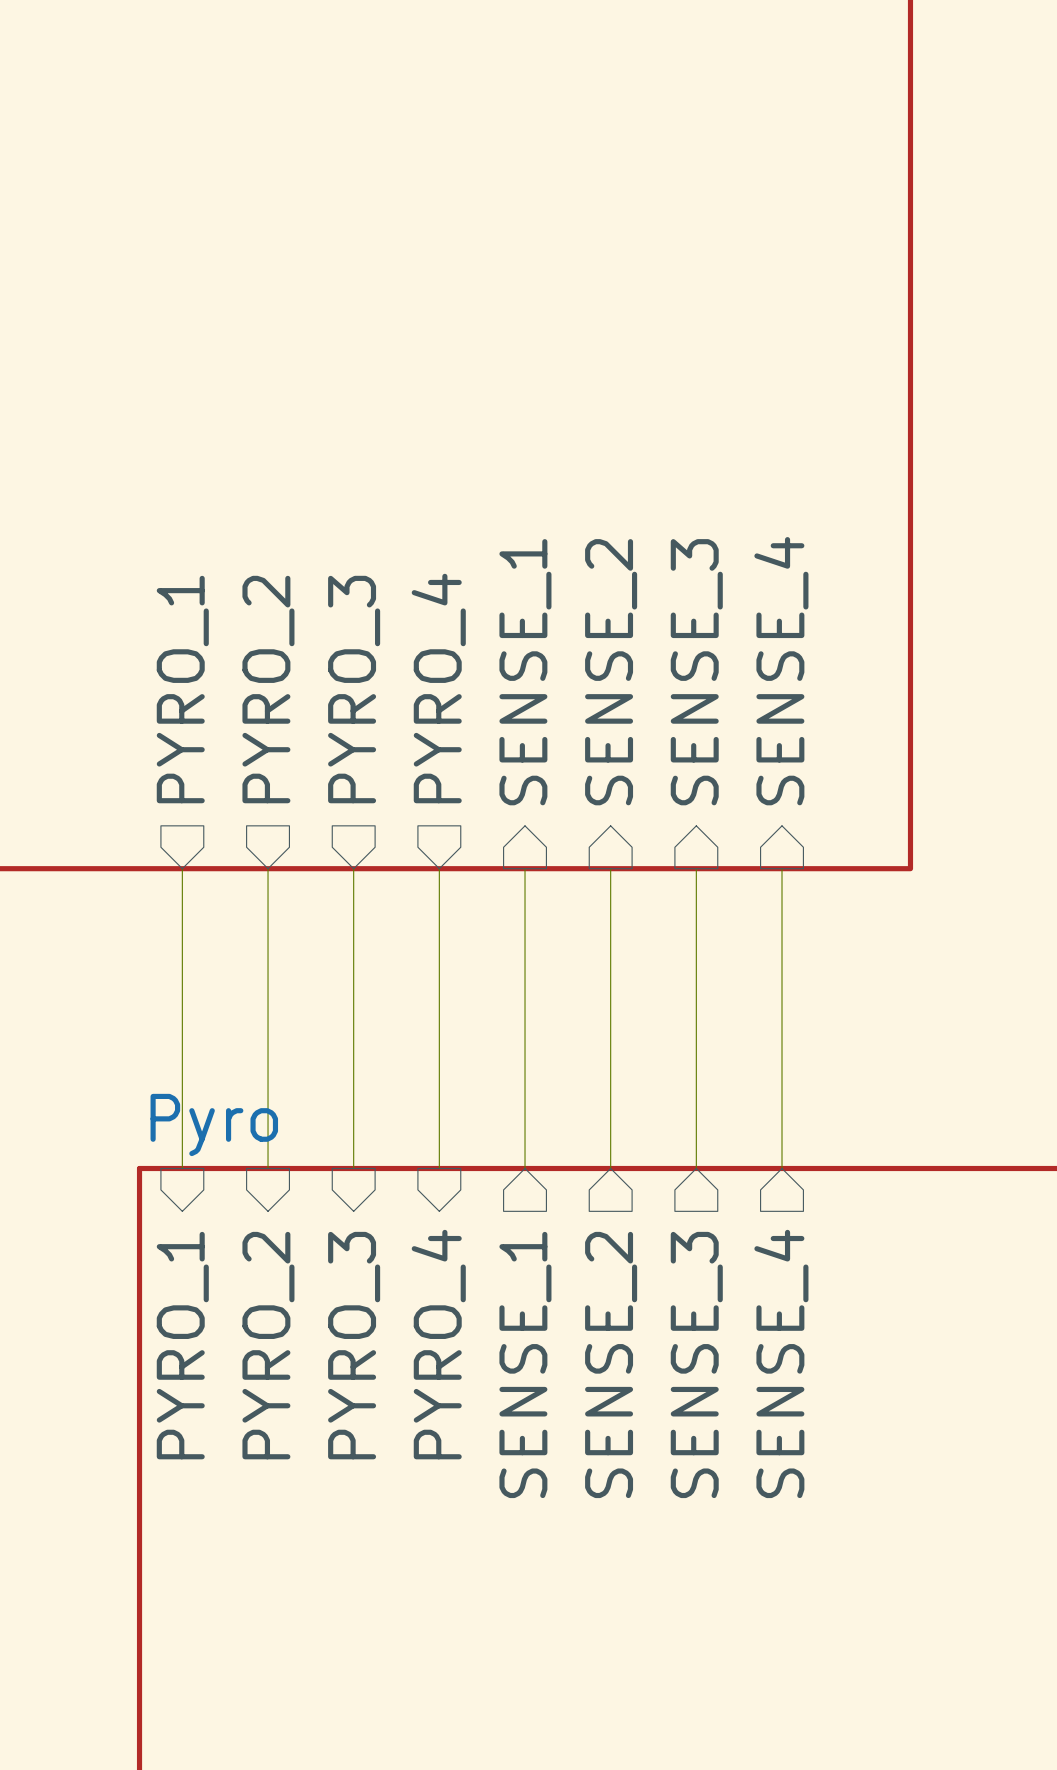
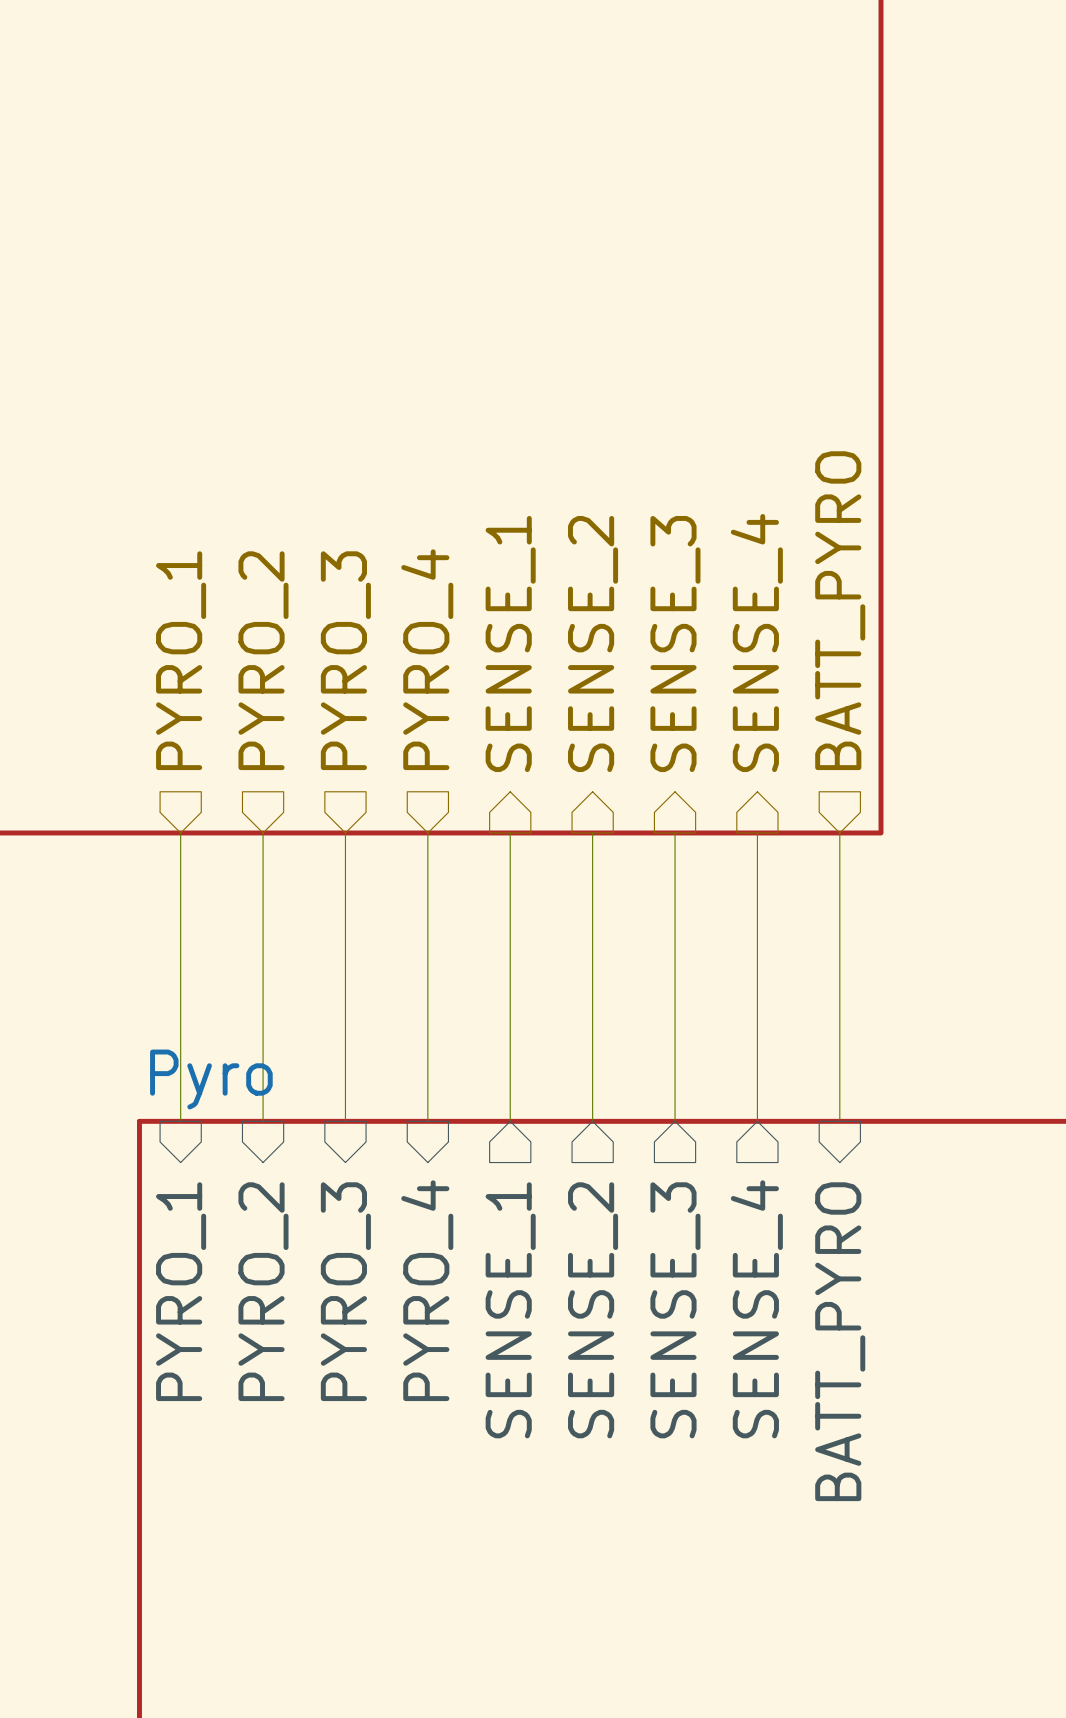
hierarchical label: none -> BATT_PYRO (840, 610)
sheet pin: SENSE_4 (781, 671) -> none
hierarchical label: none -> SENSE_4 (756, 643)
sheet pin: SENSE_1 (525, 672) -> none
hierarchical label: none -> SENSE_1 (510, 644)
sheet pin: SENSE_2 (611, 672) -> none
hierarchical label: none -> SENSE_2 (593, 644)
sheet pin: SENSE_3 (696, 672) -> none
hierarchical label: none -> SENSE_3 (675, 644)
sheet pin: PYRO_4 (438, 688) -> none
hierarchical label: none -> PYRO_4 (427, 659)
sheet pin: PYRO_1 (182, 689) -> none
hierarchical label: none -> PYRO_1 (181, 660)
sheet pin: PYRO_2 (268, 689) -> none
hierarchical label: none -> PYRO_2 (263, 660)
sheet pin: PYRO_3 (354, 689) -> none
hierarchical label: none -> PYRO_3 (345, 660)
wire: none -> (839, 832) (839, 1121)
sheet pin: none -> BATT_PYRO (840, 1341)

